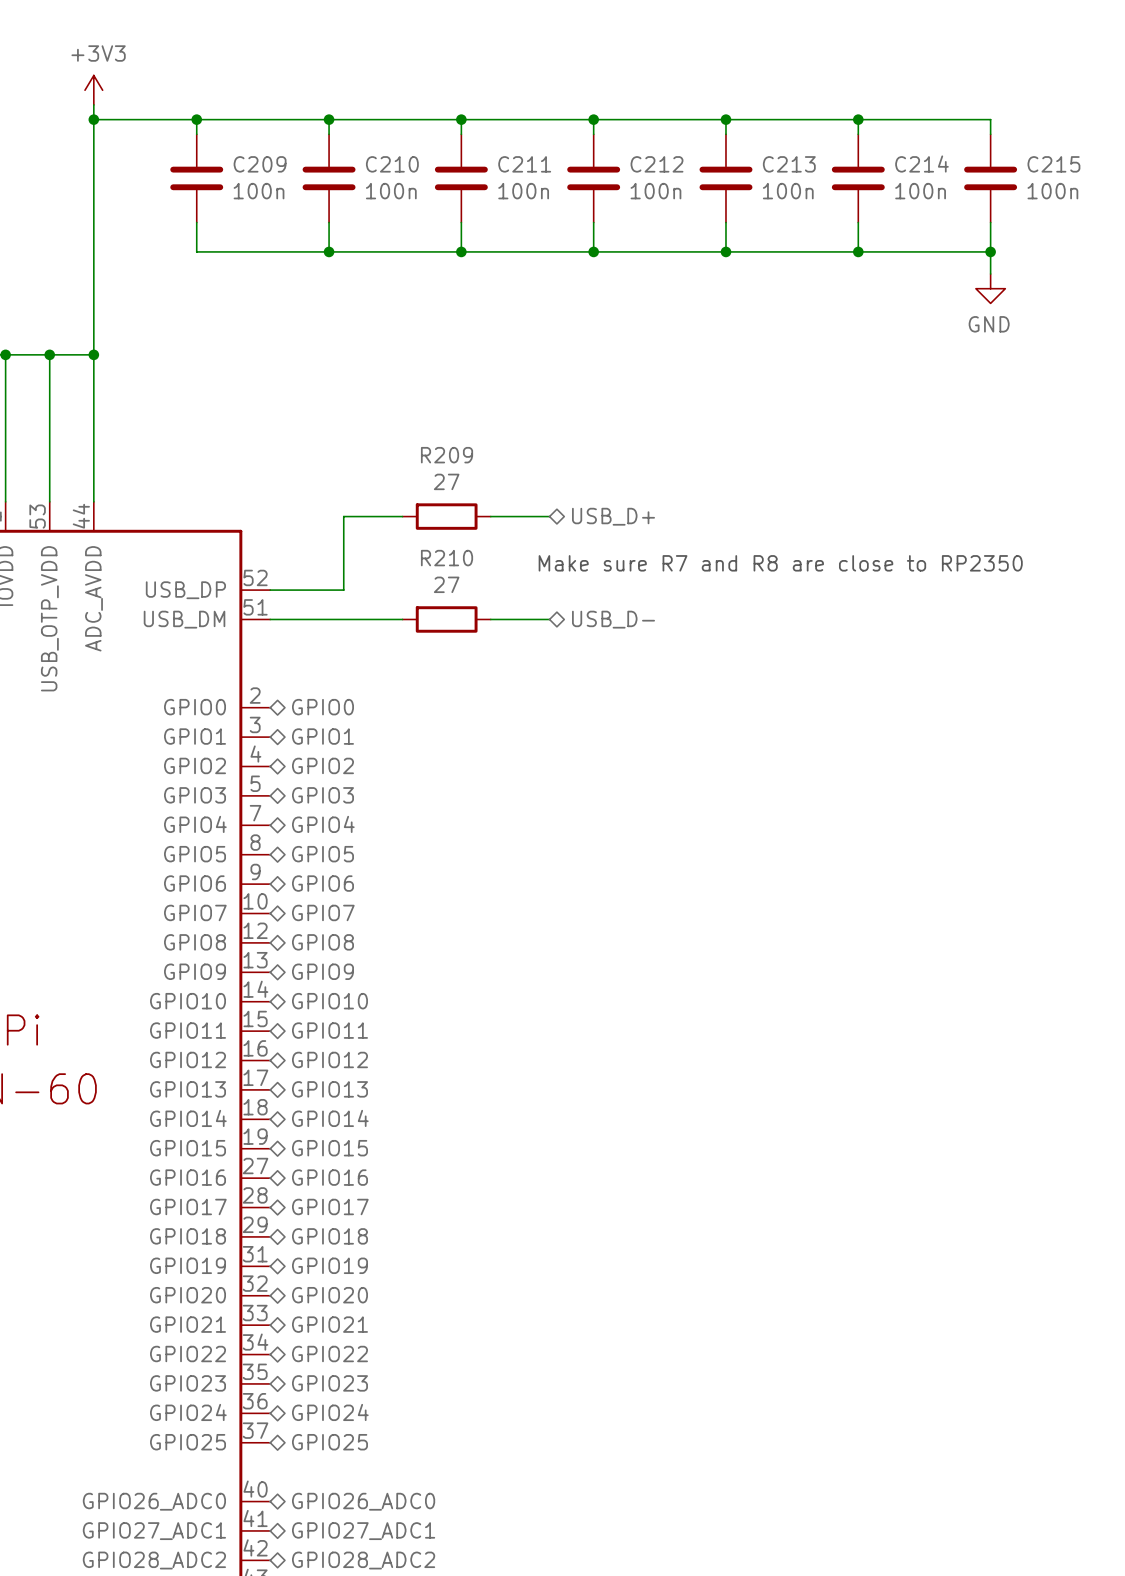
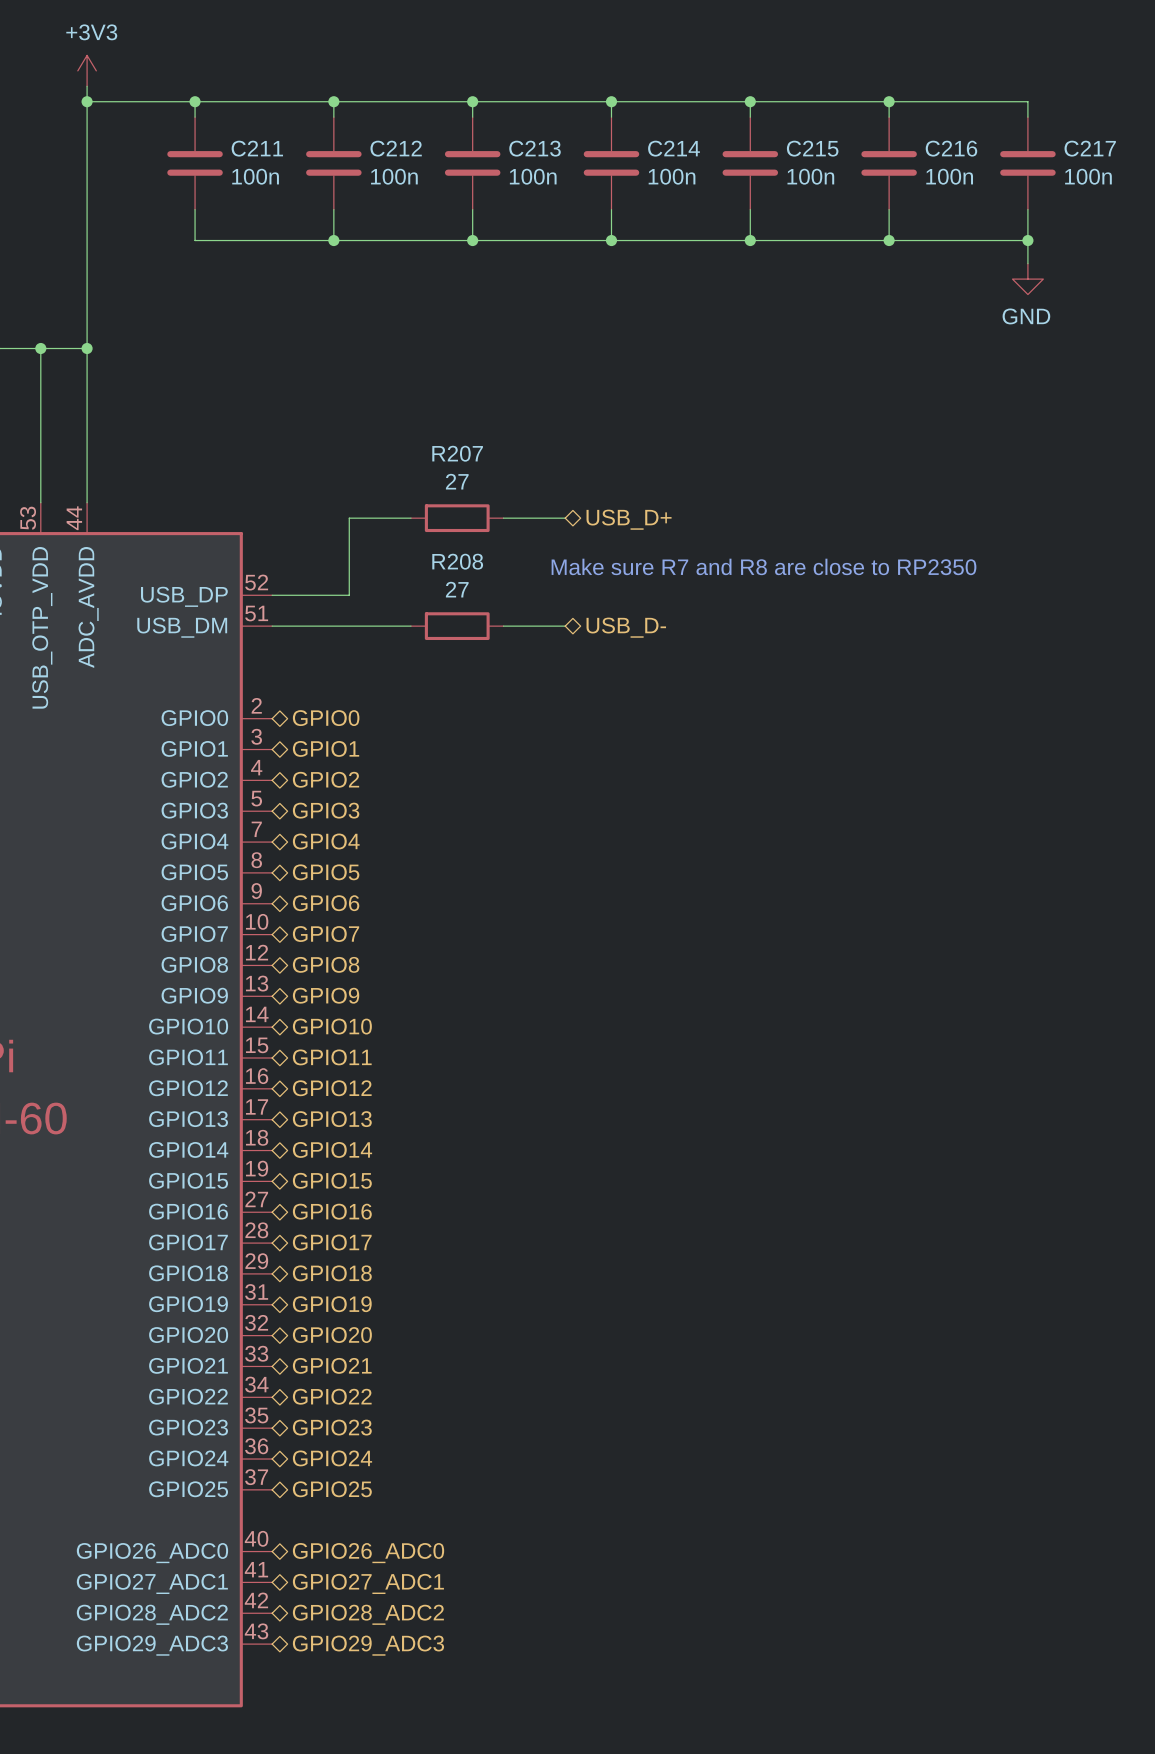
C209 name: C209 (260, 164) -> C211 (257, 148)
C210 name: C210 (392, 164) -> C212 (396, 148)
C211 name: C211 (524, 164) -> C213 (535, 148)
C212 name: C212 (657, 164) -> C214 (674, 148)
C213 name: C213 (789, 164) -> C215 (812, 148)
C214 name: C214 (921, 164) -> C216 (951, 148)
C215 name: C215 (1053, 164) -> C217 (1090, 148)
R209 name: R209 (447, 455) -> R207 (457, 453)
R210 name: R210 (447, 558) -> R208 (457, 561)

